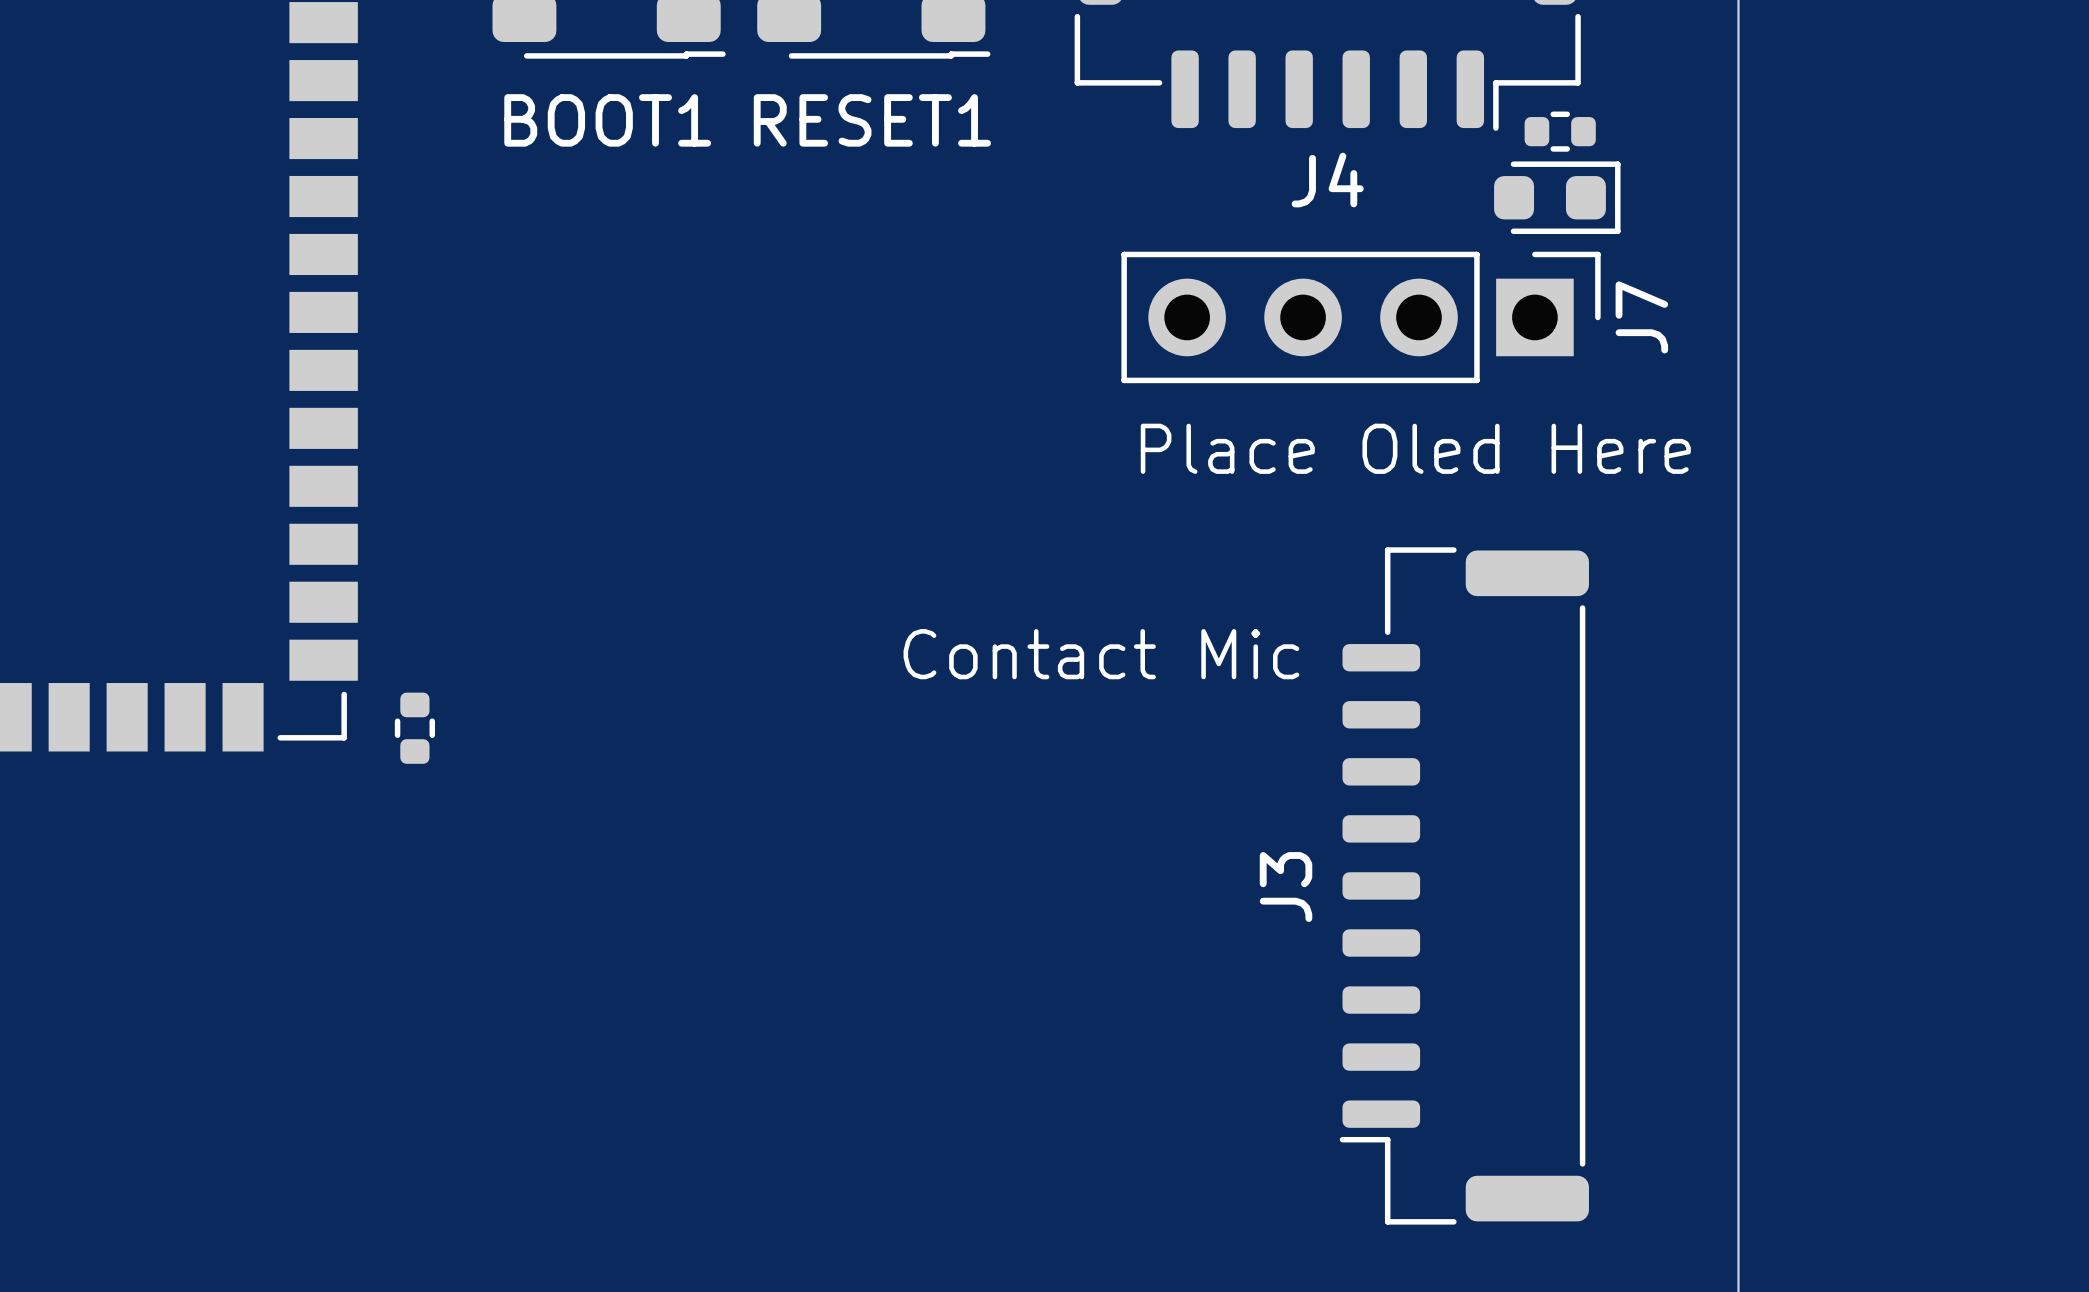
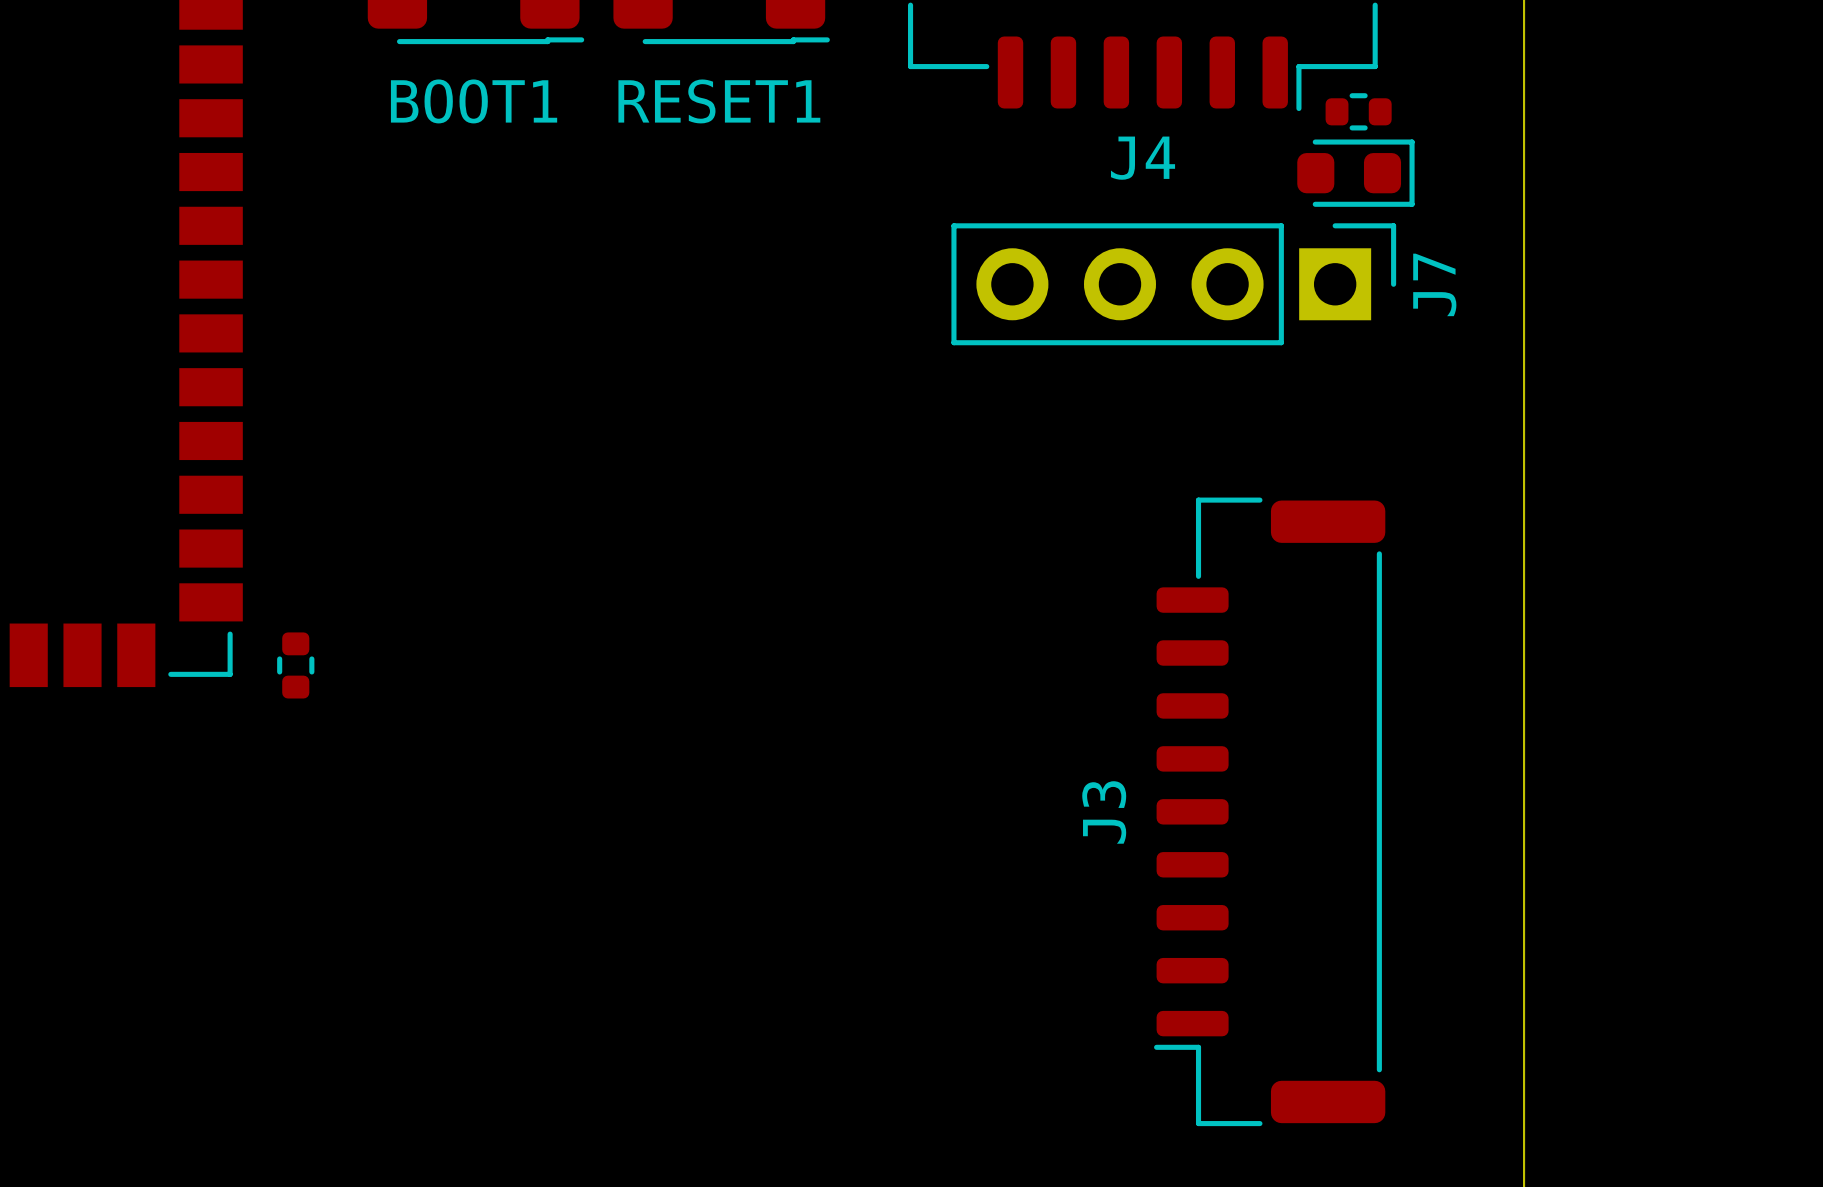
text: Place Oled Here (1415, 448) -> none
text: Contact Mic (1101, 654) -> none

